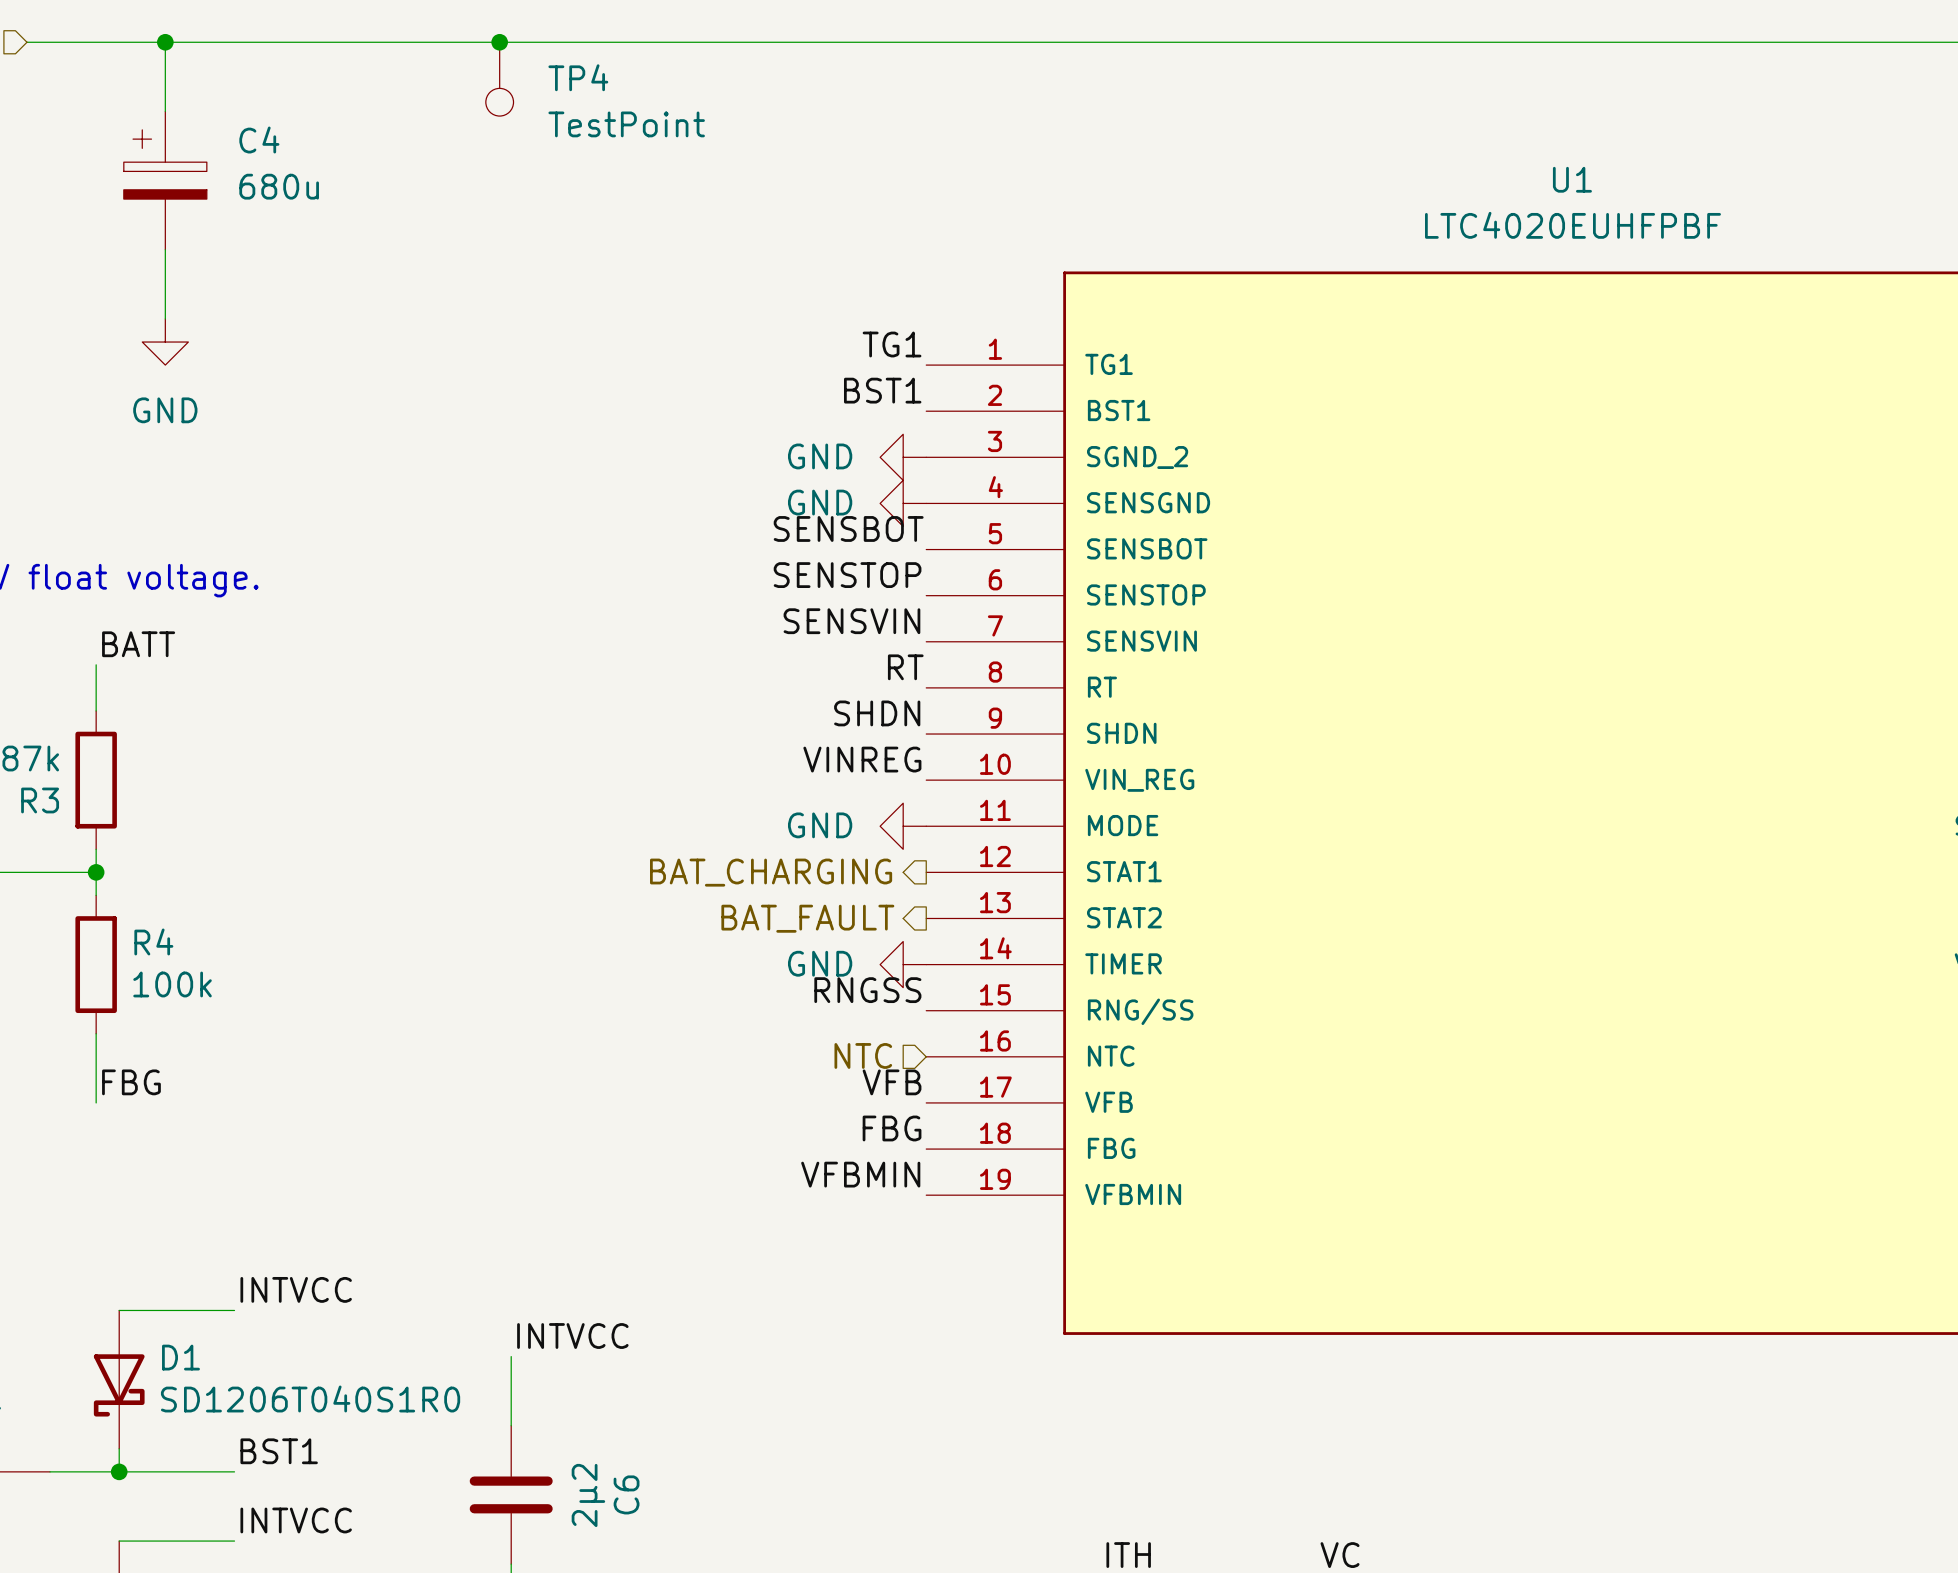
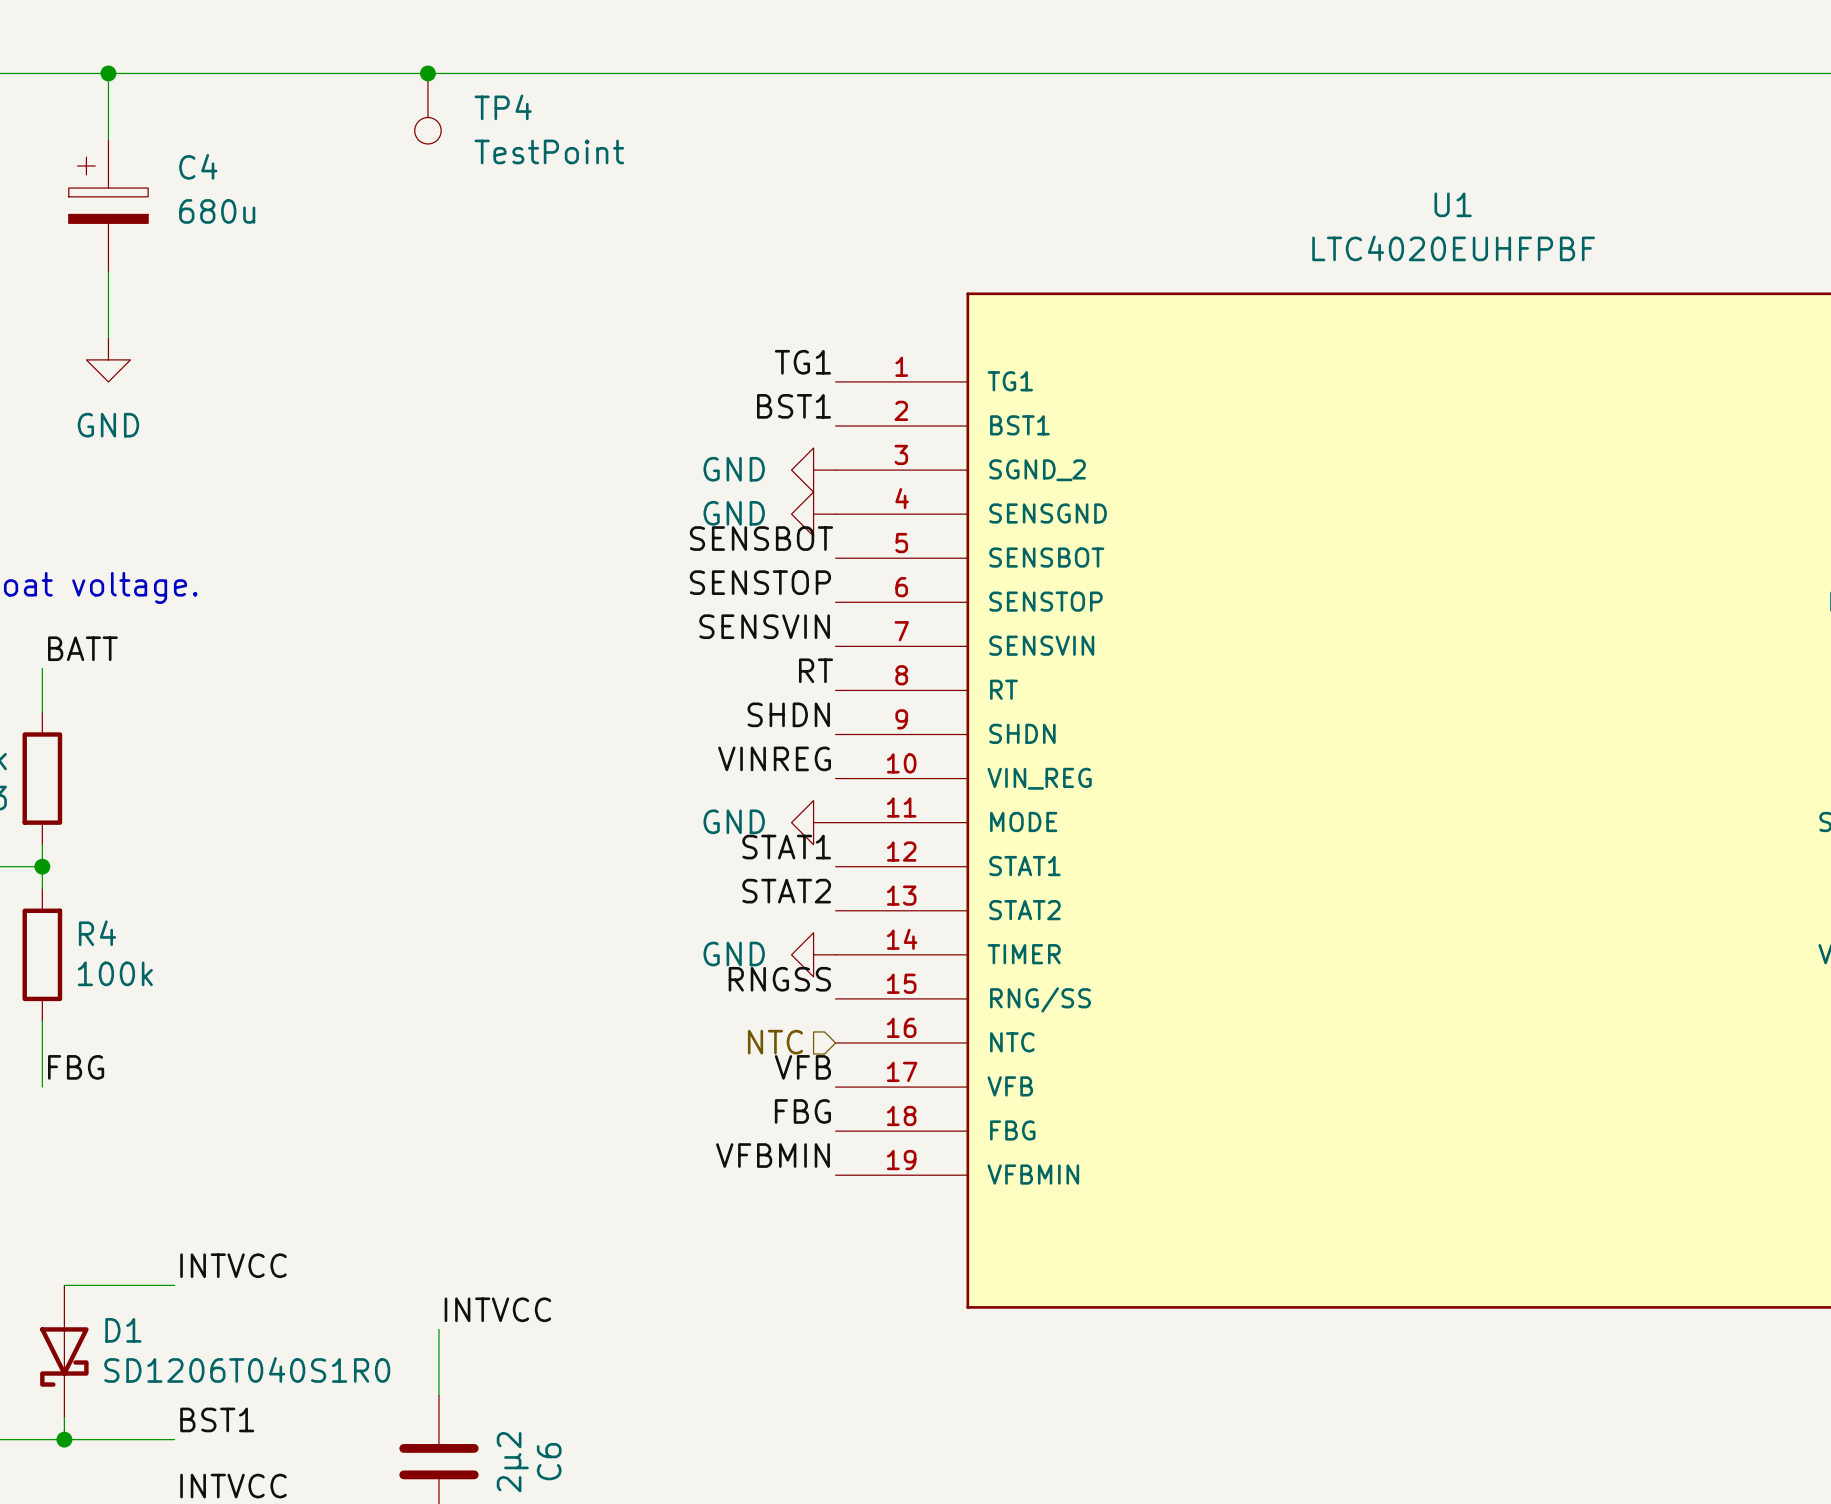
label: none -> STAT1 (786, 847)
hierarchical label: BAT_CHARGING (771, 872) -> none
label: none -> STAT2 (786, 891)
hierarchical label: BAT_FAULT (807, 918) -> none

